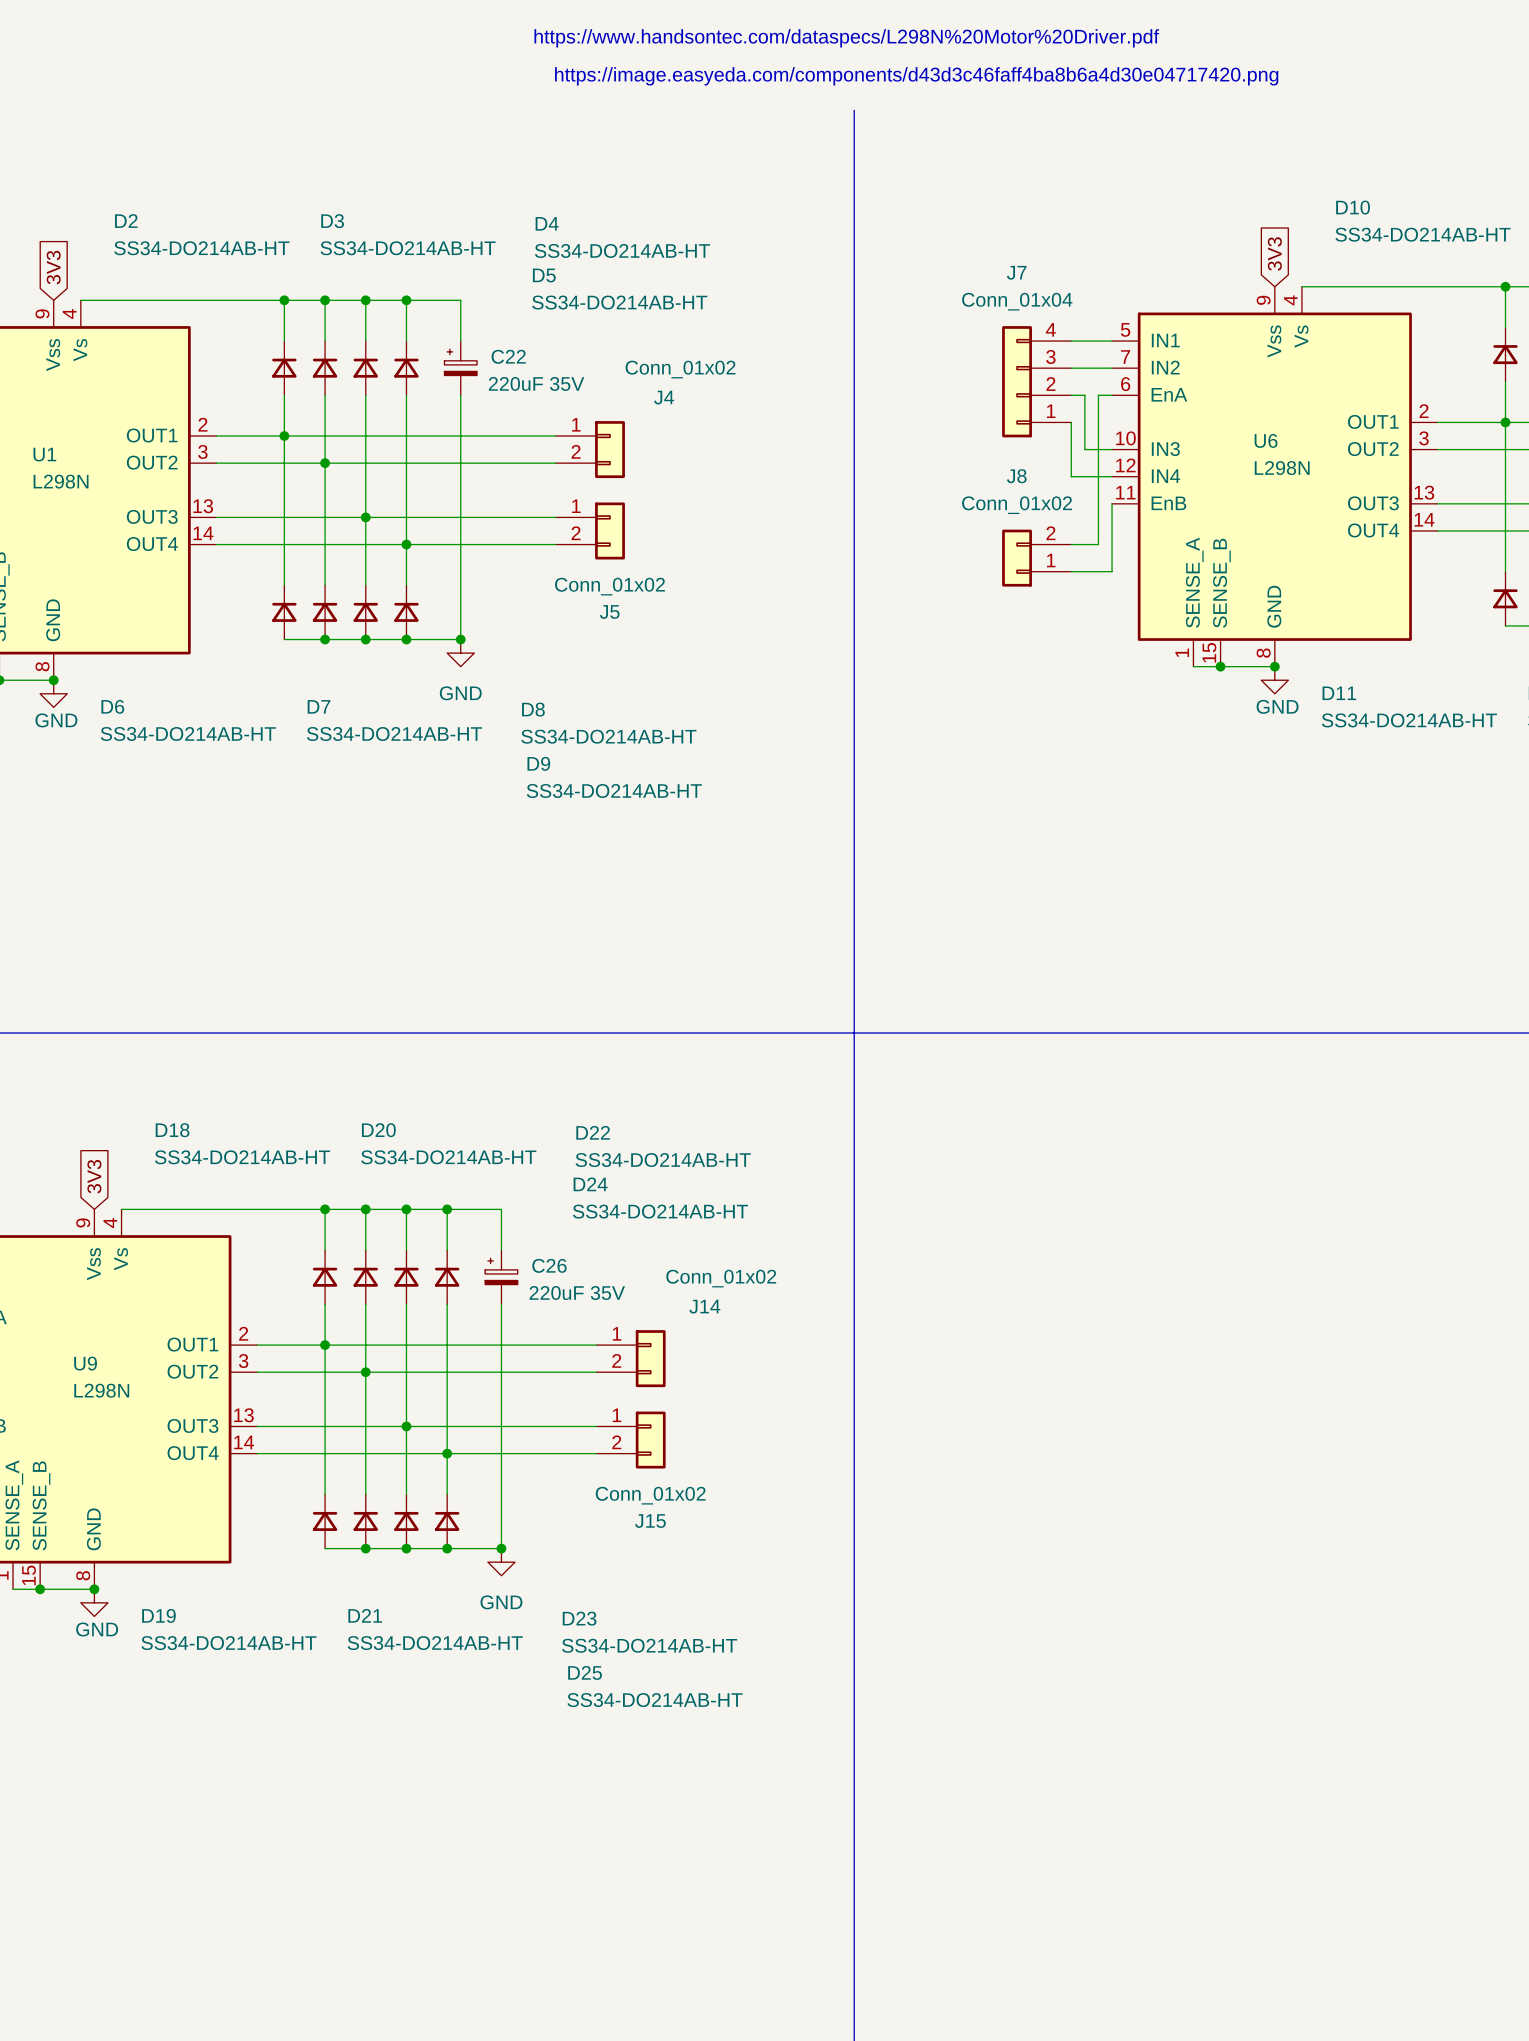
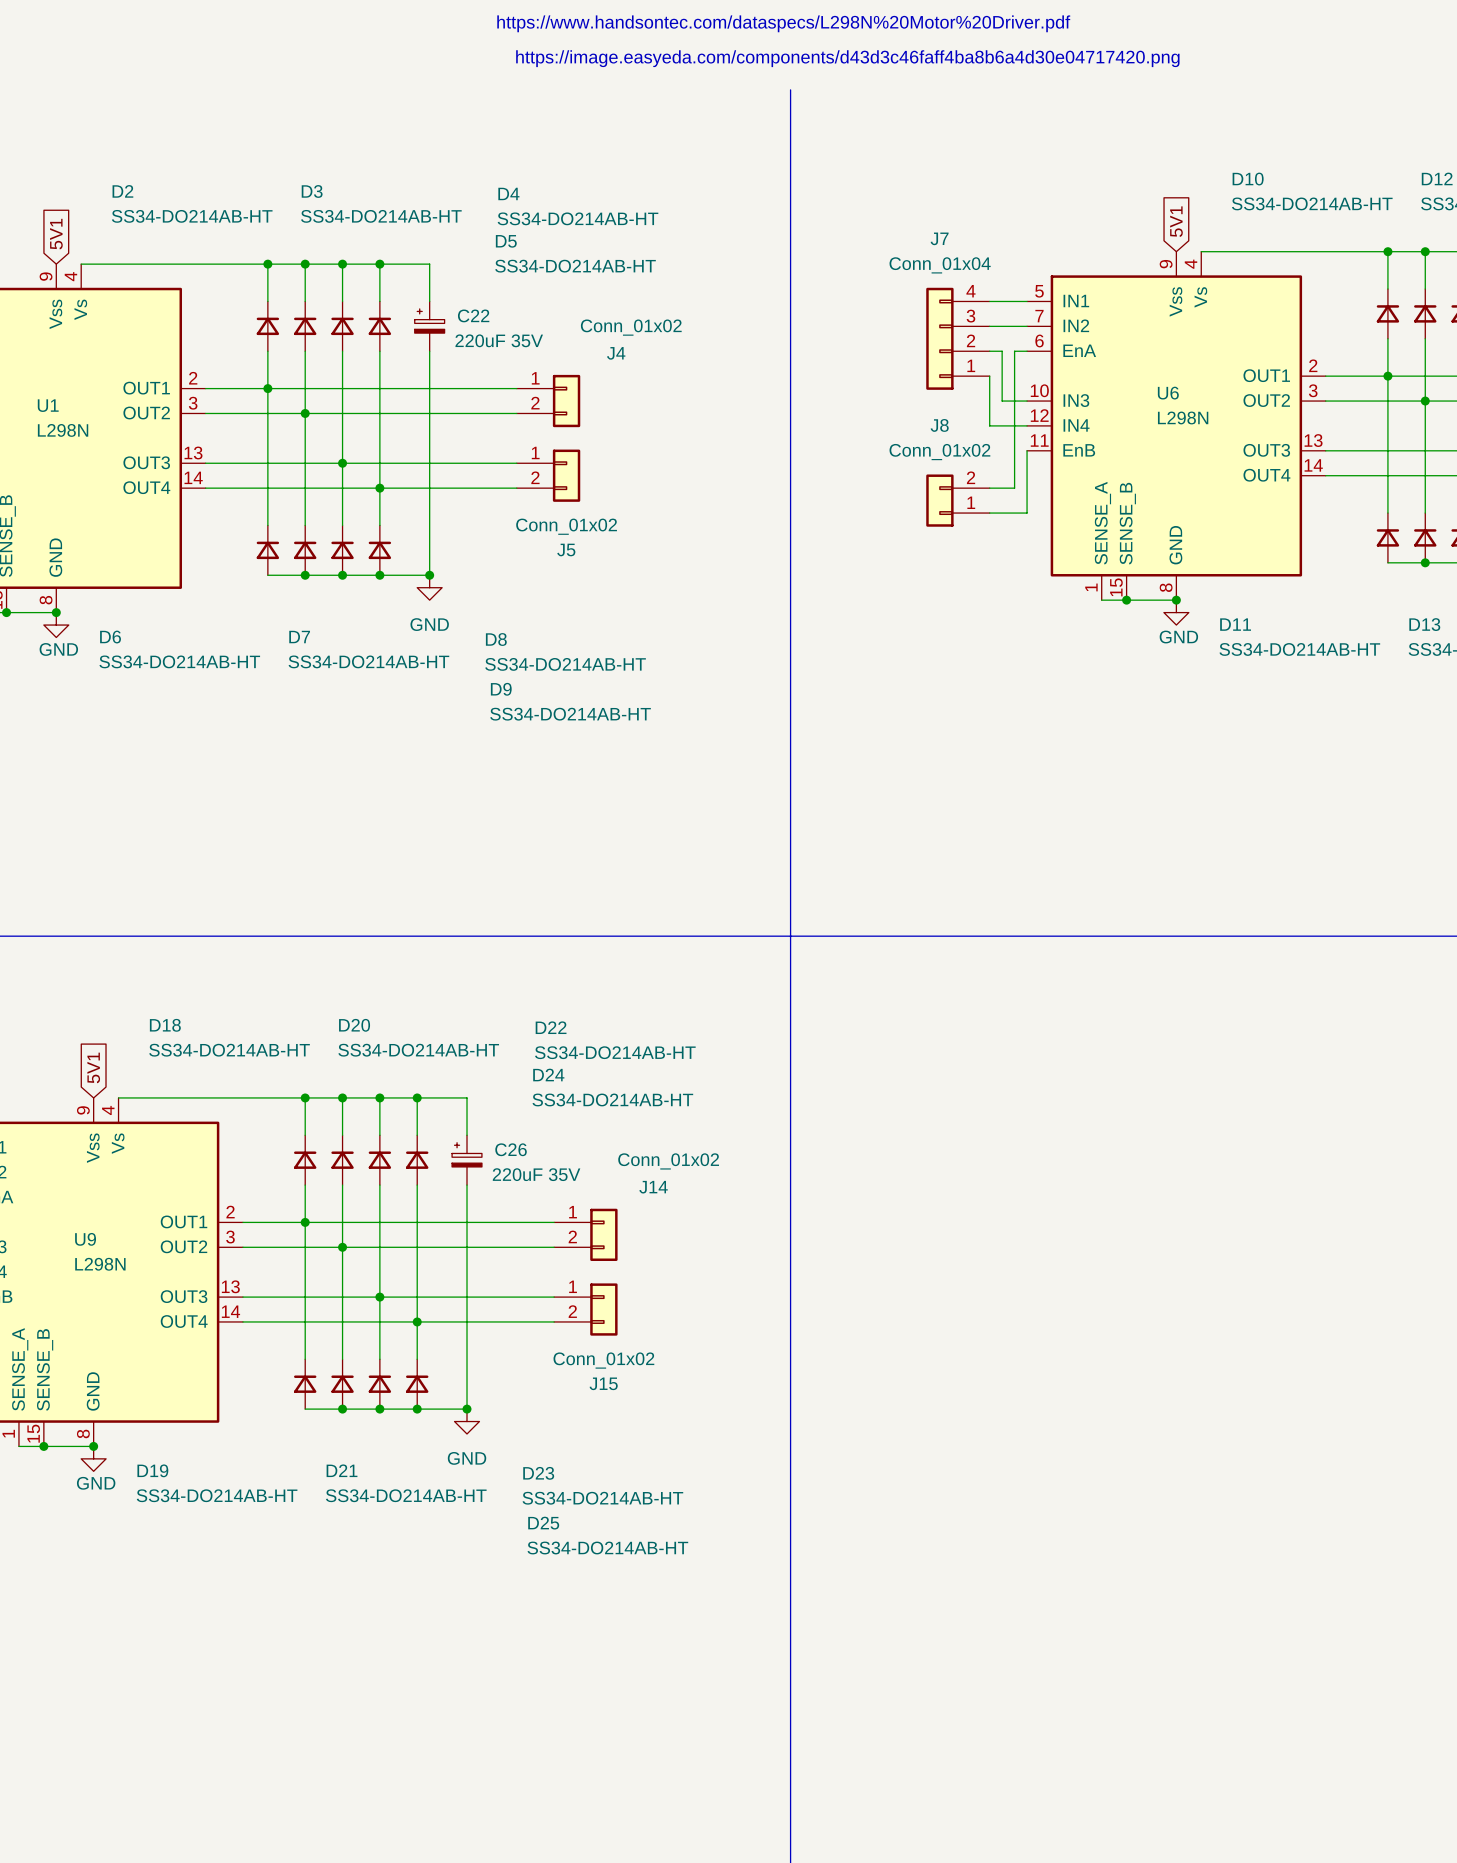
global label: 3V3 (1274, 254) -> 5V1 (1176, 221)
global label: 3V3 (53, 267) -> 5V1 (56, 234)
global label: 3V3 (94, 1176) -> 5V1 (93, 1067)

